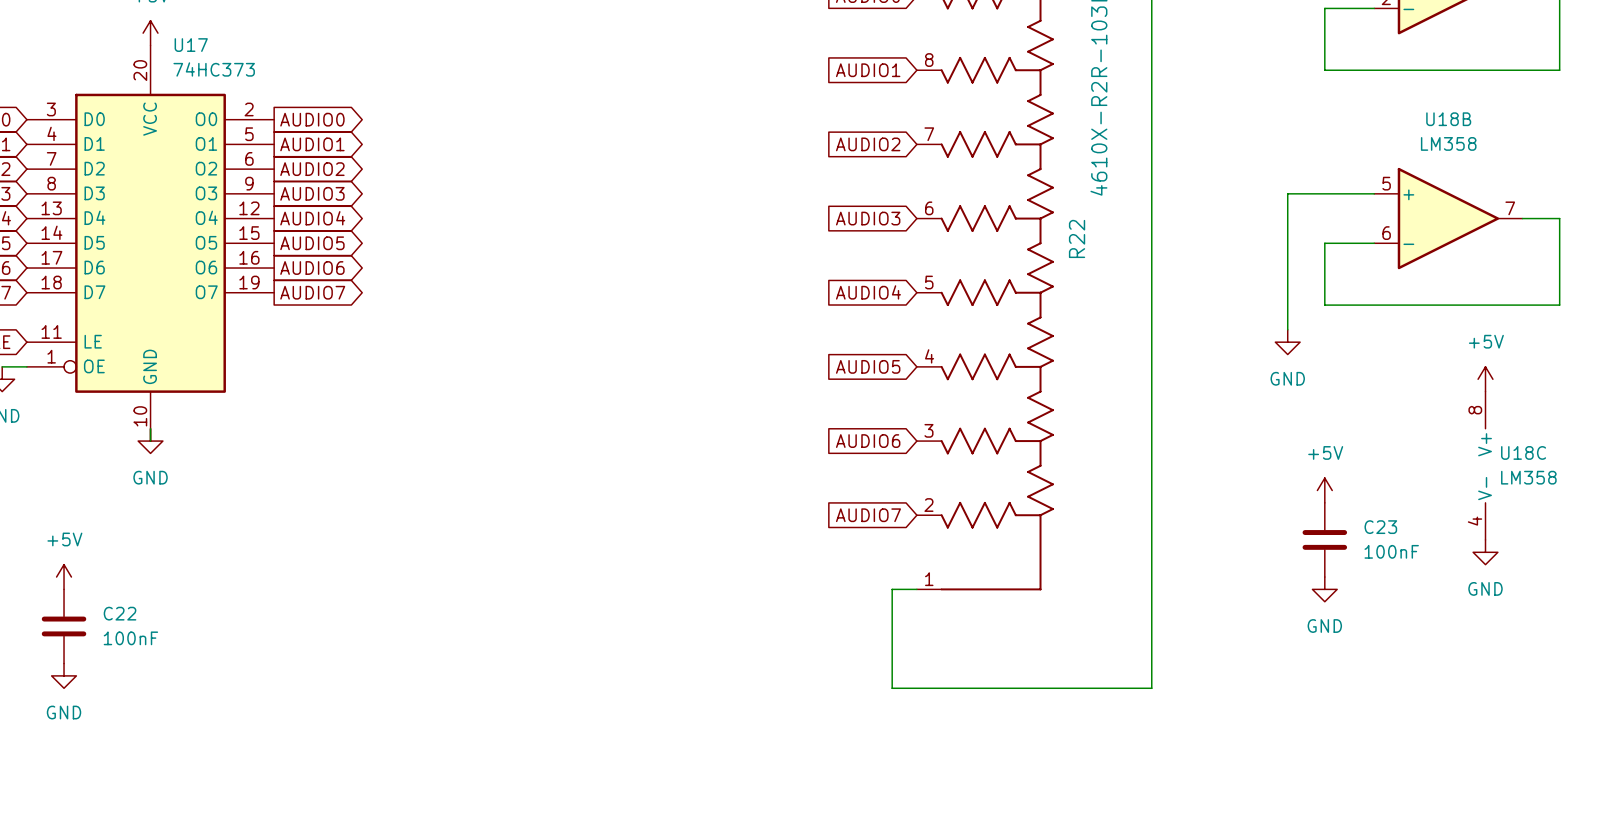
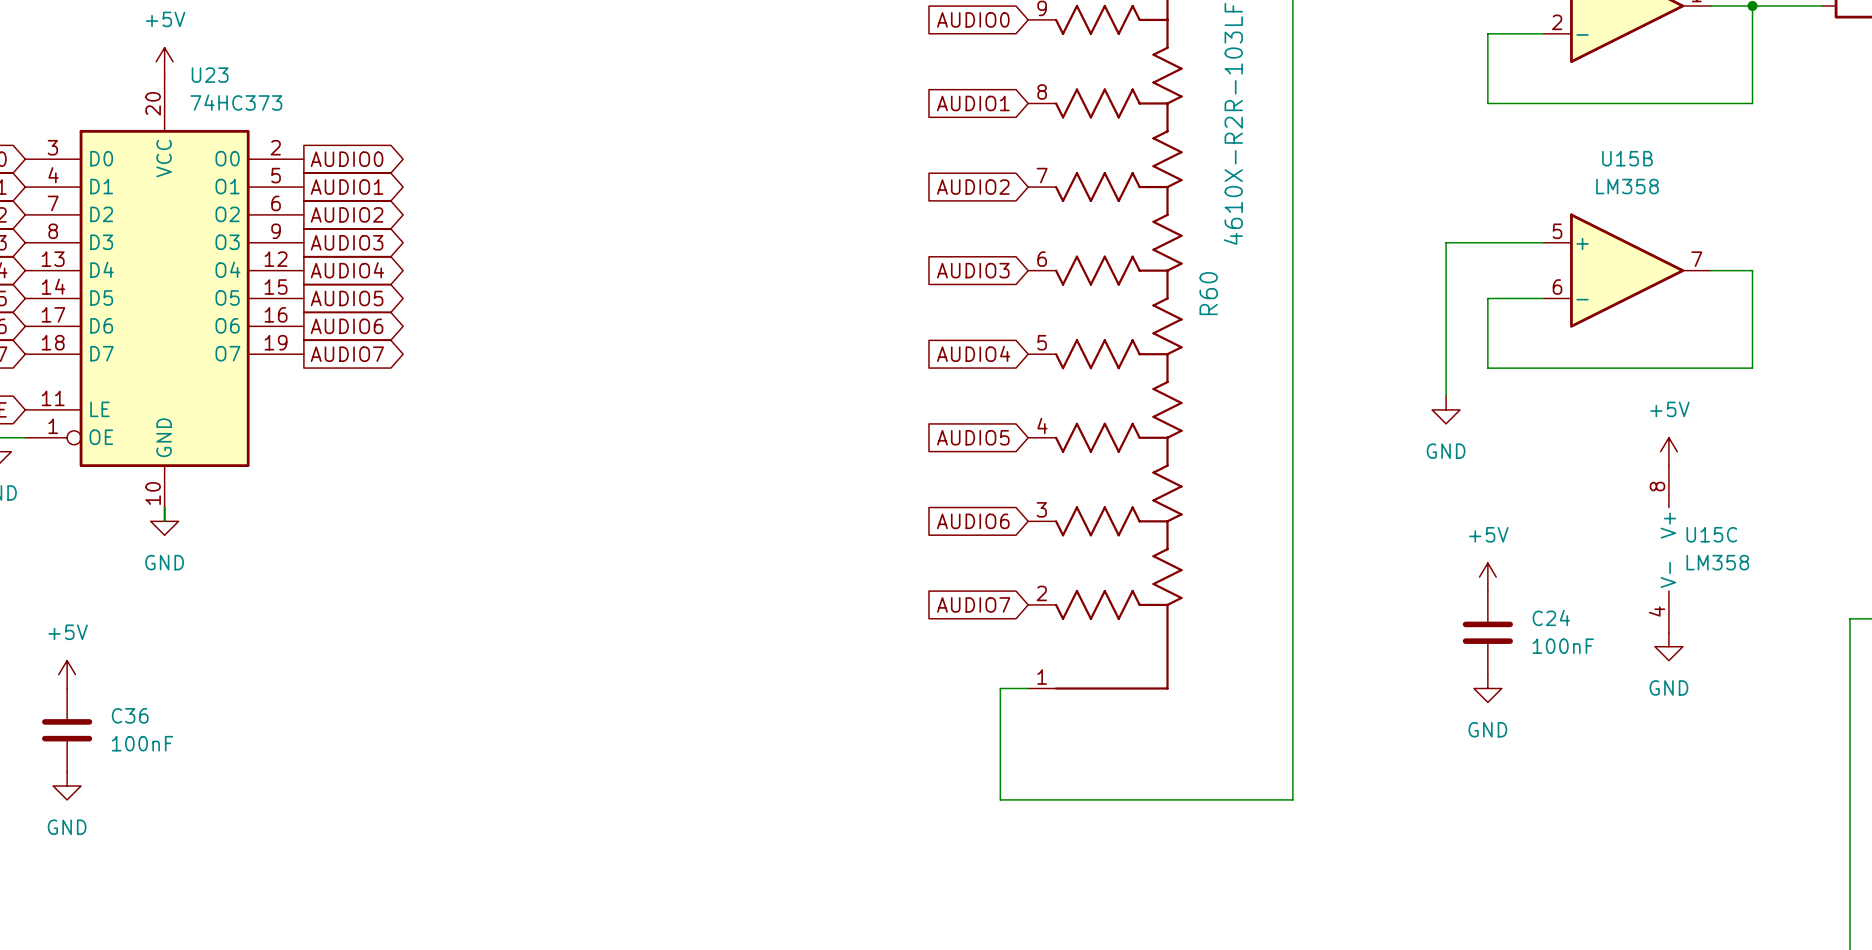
U17 name: U17 (191, 45) -> U23 (210, 75)
U18B name: U18B (1448, 119) -> U15B (1627, 158)
R22 name: R22 (1077, 238) -> R60 (1208, 293)
U18C name: U18C (1523, 452) -> U15C (1711, 534)
C23 name: C23 (1380, 527) -> C24 (1551, 618)
C22 name: C22 (120, 613) -> C36 (130, 715)

